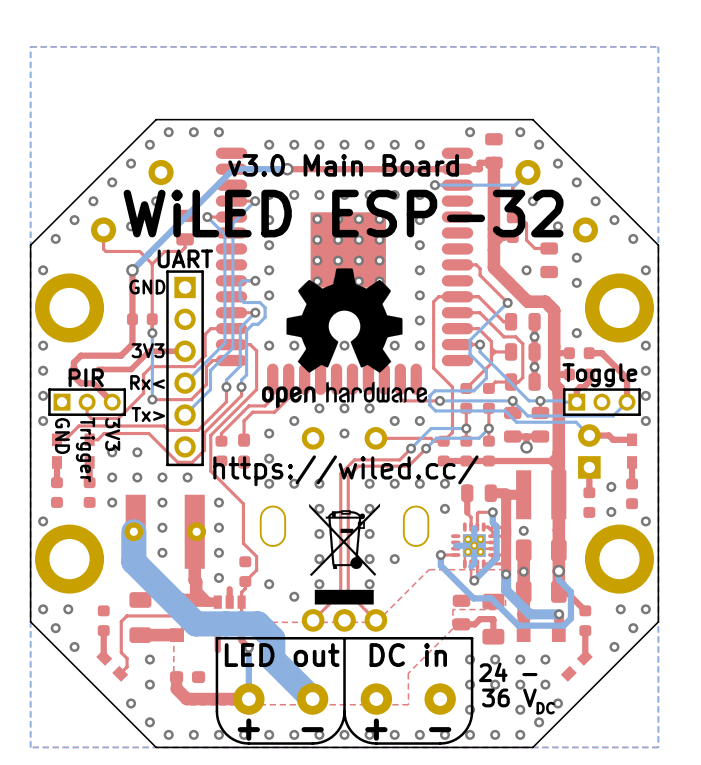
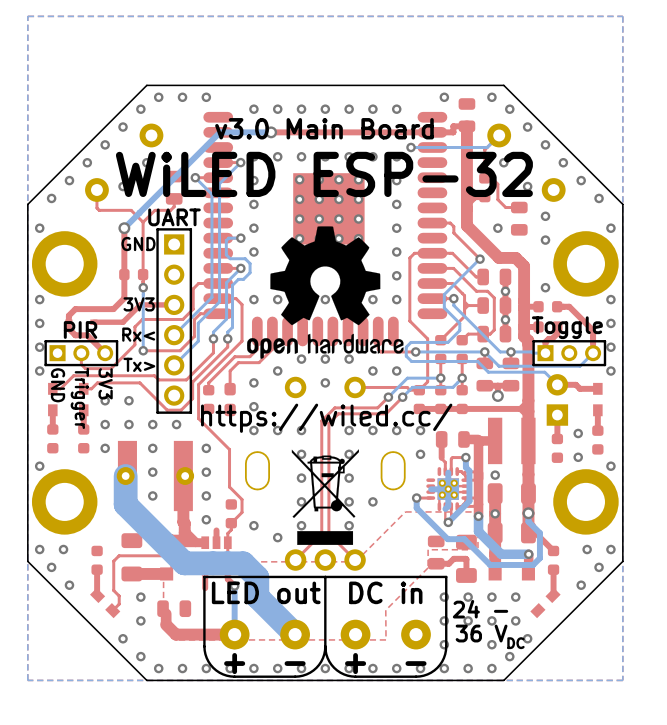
part footprint: [169, 671, 206, 684] -> [157, 600, 192, 618]

